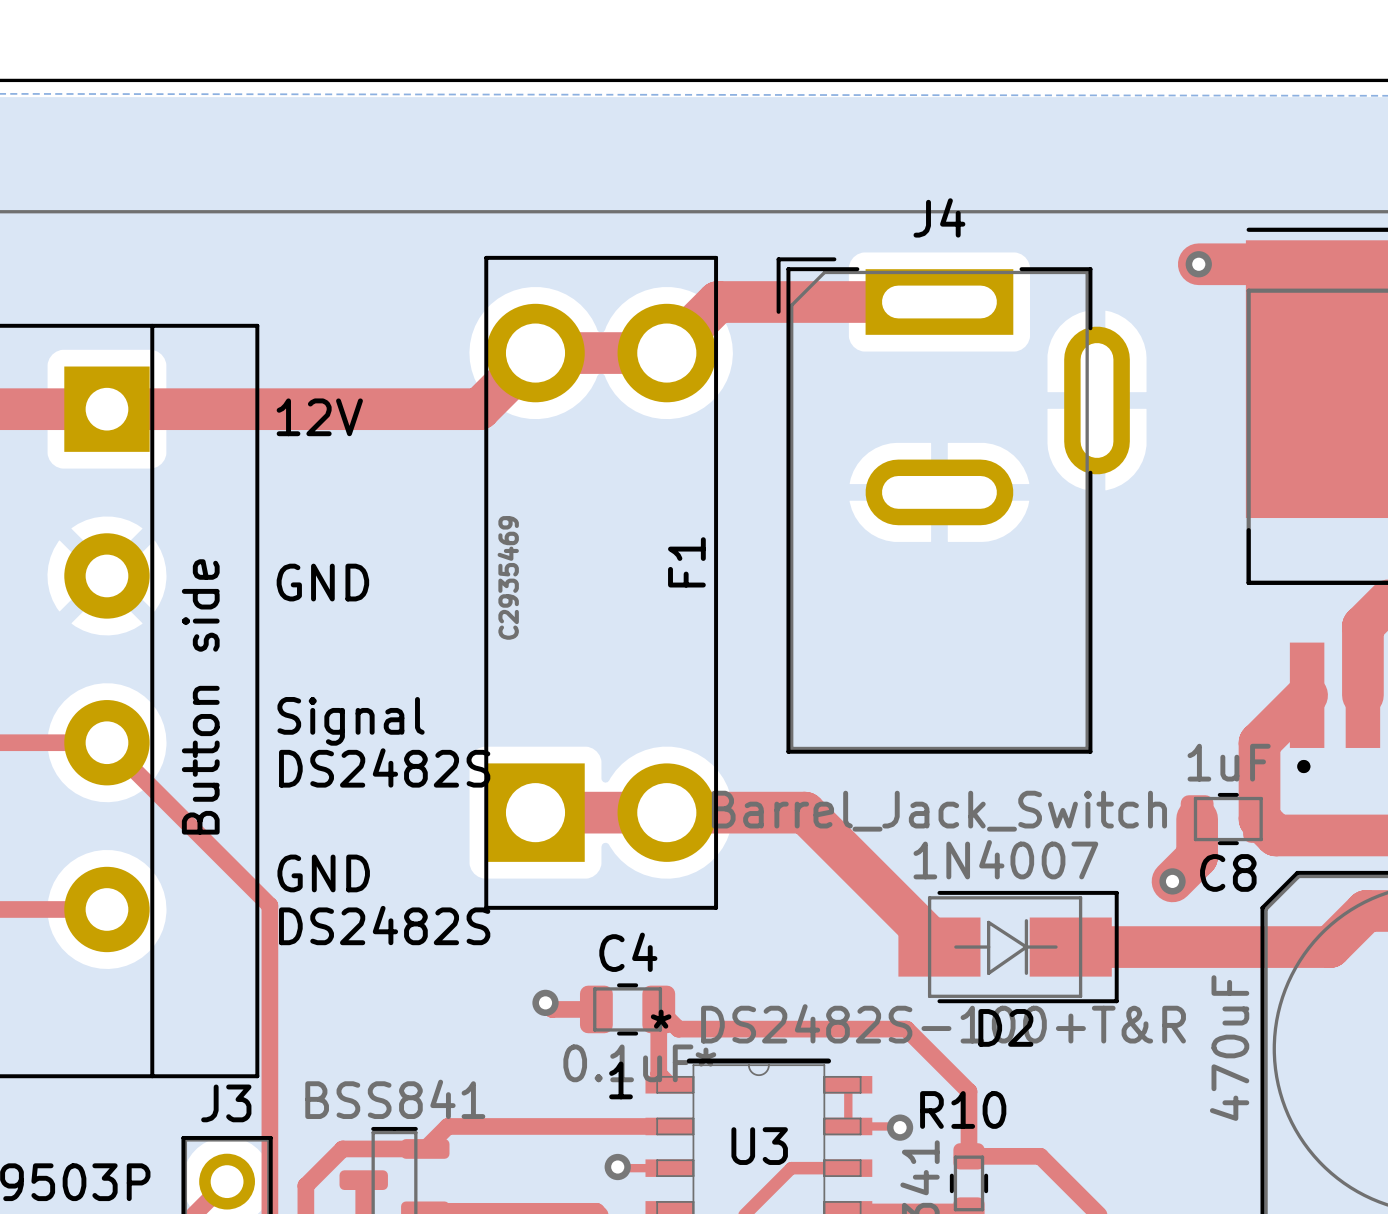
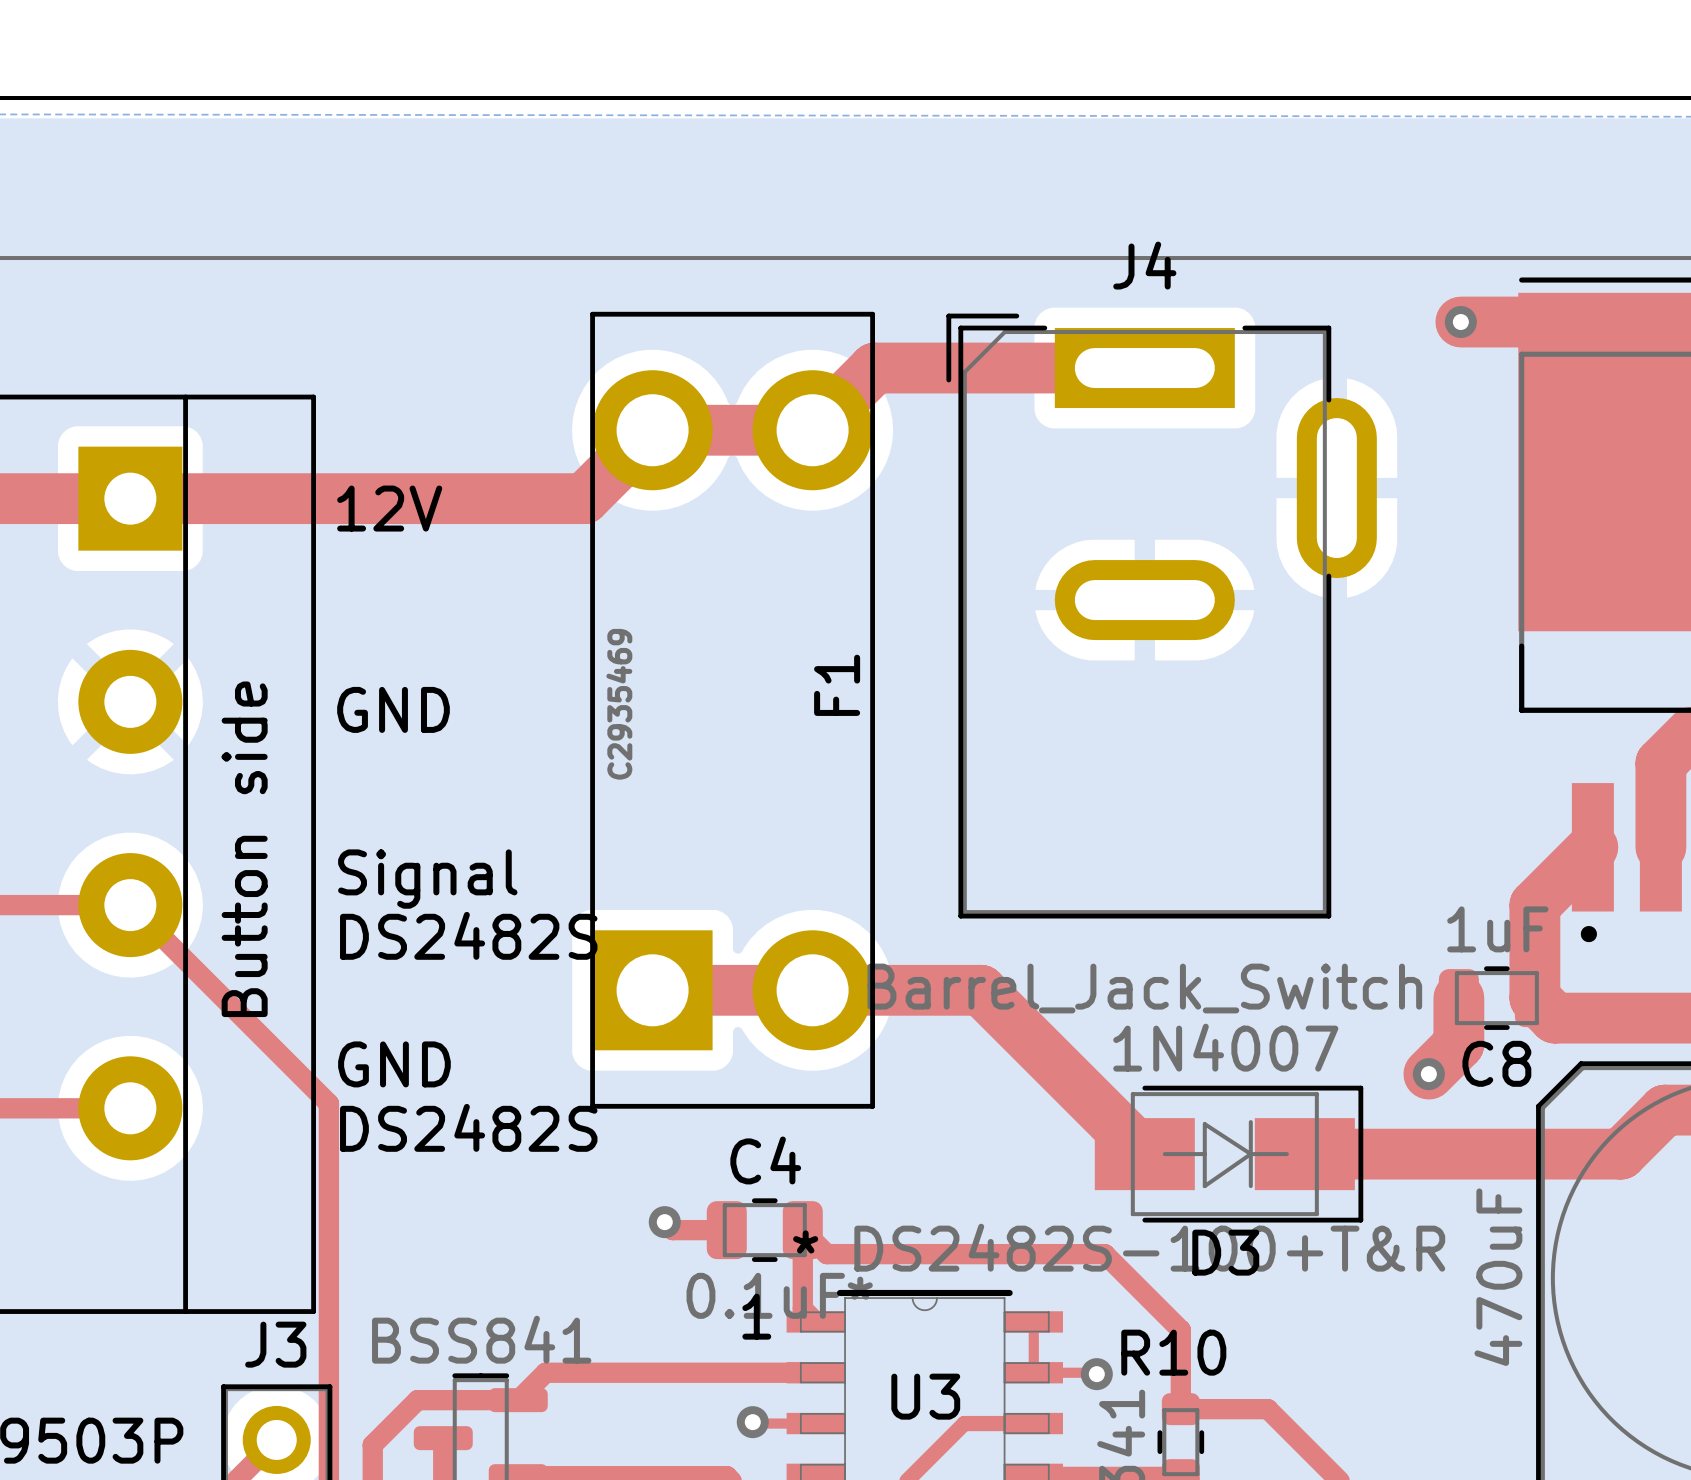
D2 name: D2 (1005, 1027) -> D3 (1225, 1252)

